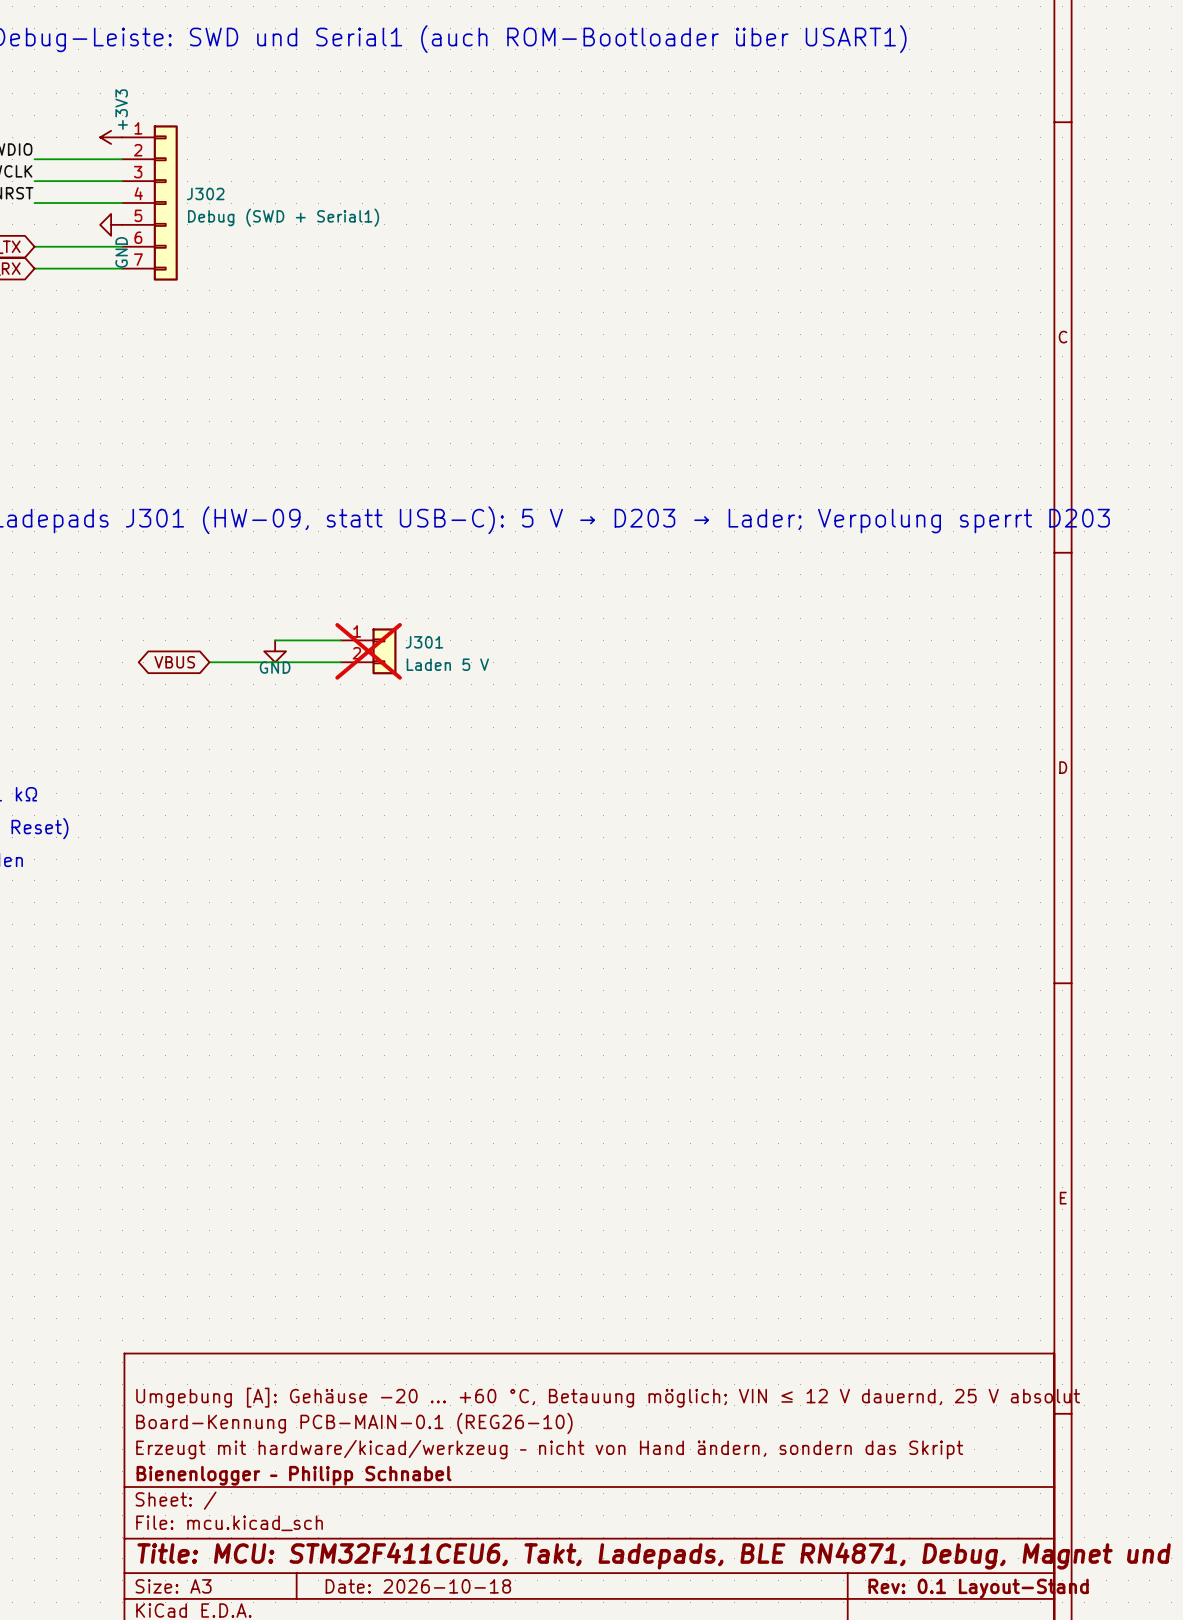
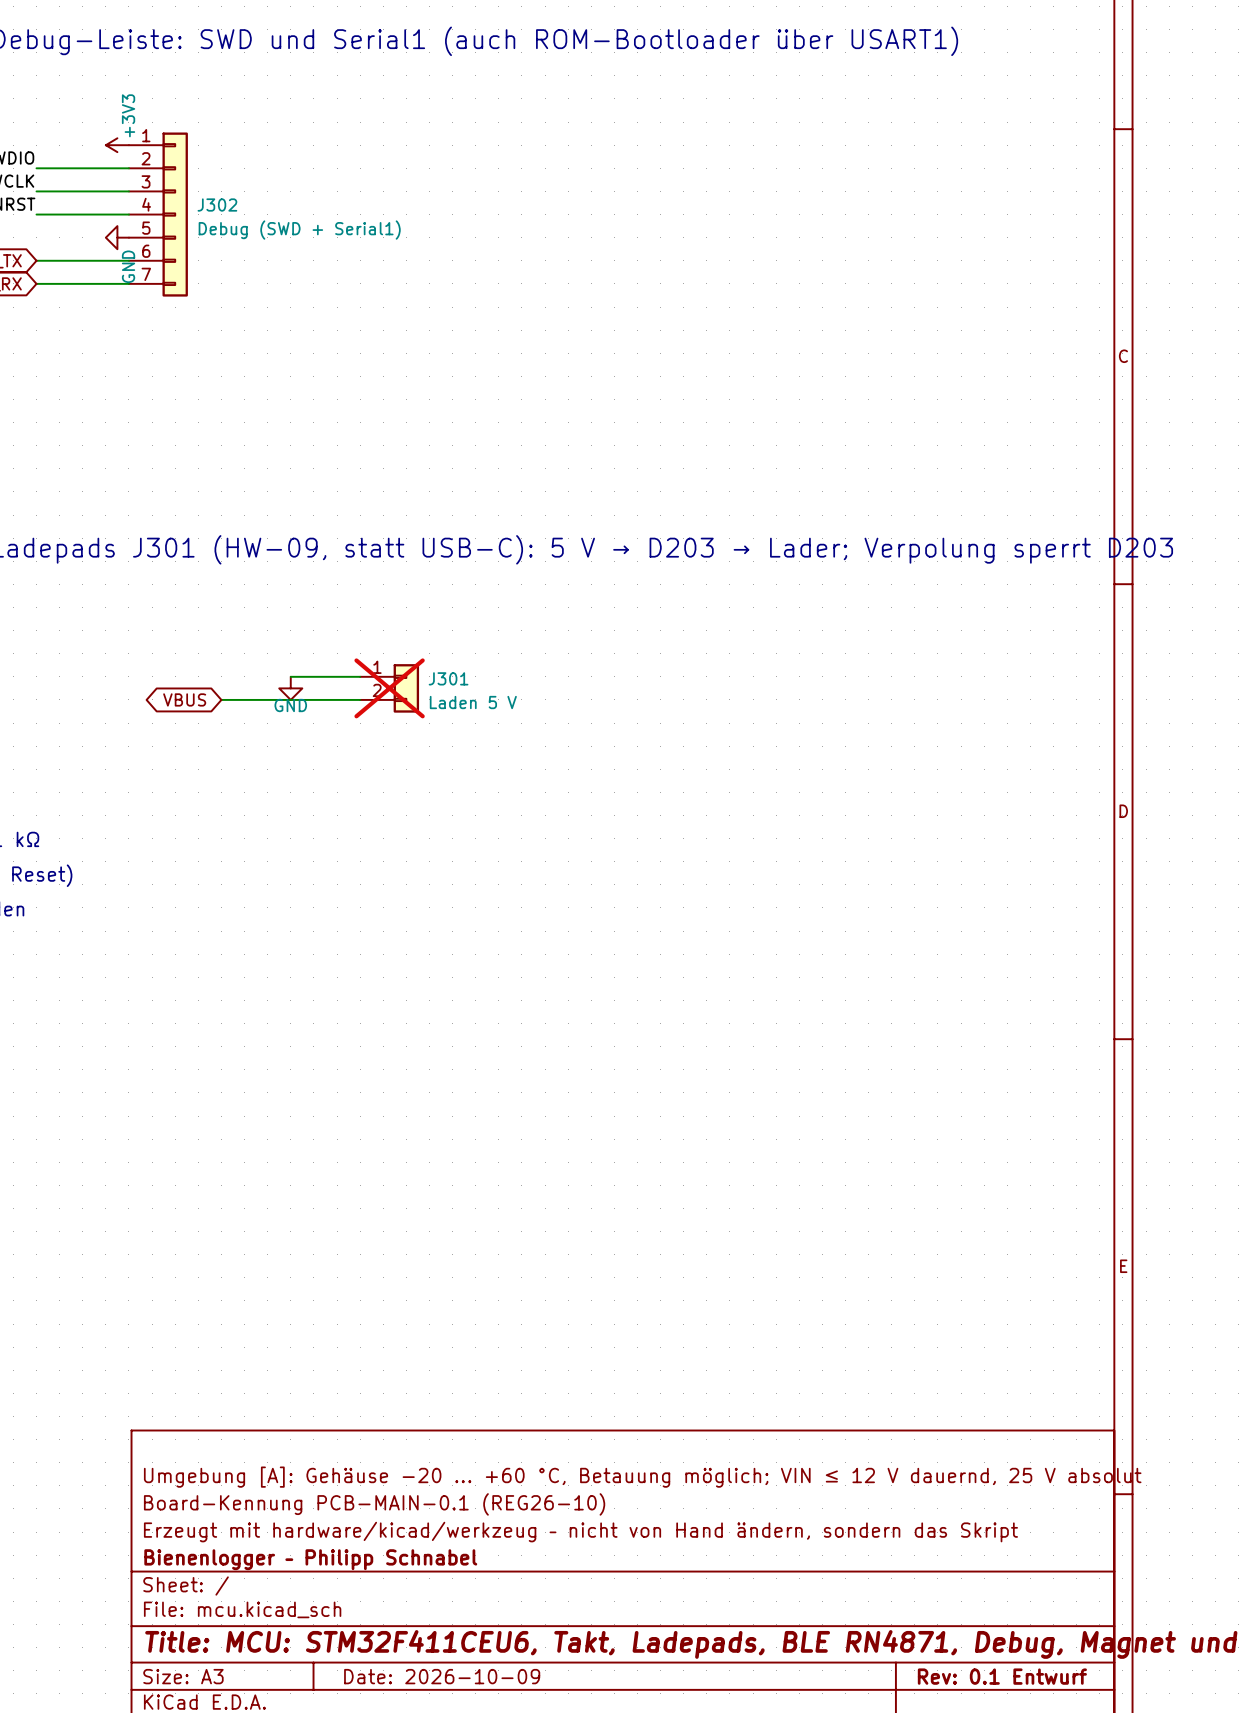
title block: Date: 2026-10-18 (418, 1586) -> Date: 2026-10-09 (442, 1676)
title block: Rev: 0.1 Layout-Stand (978, 1588) -> Rev: 0.1 Entwurf (1002, 1676)

